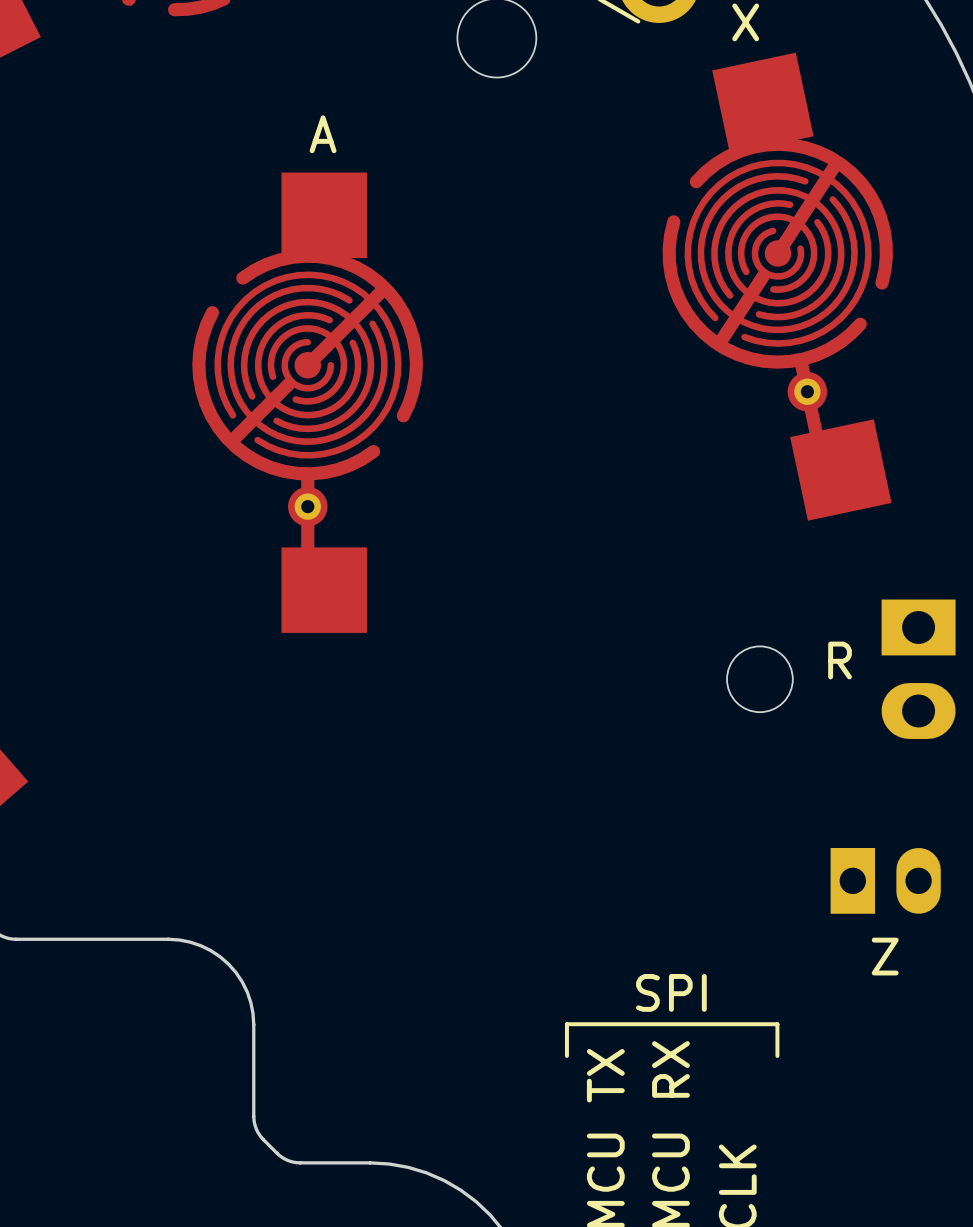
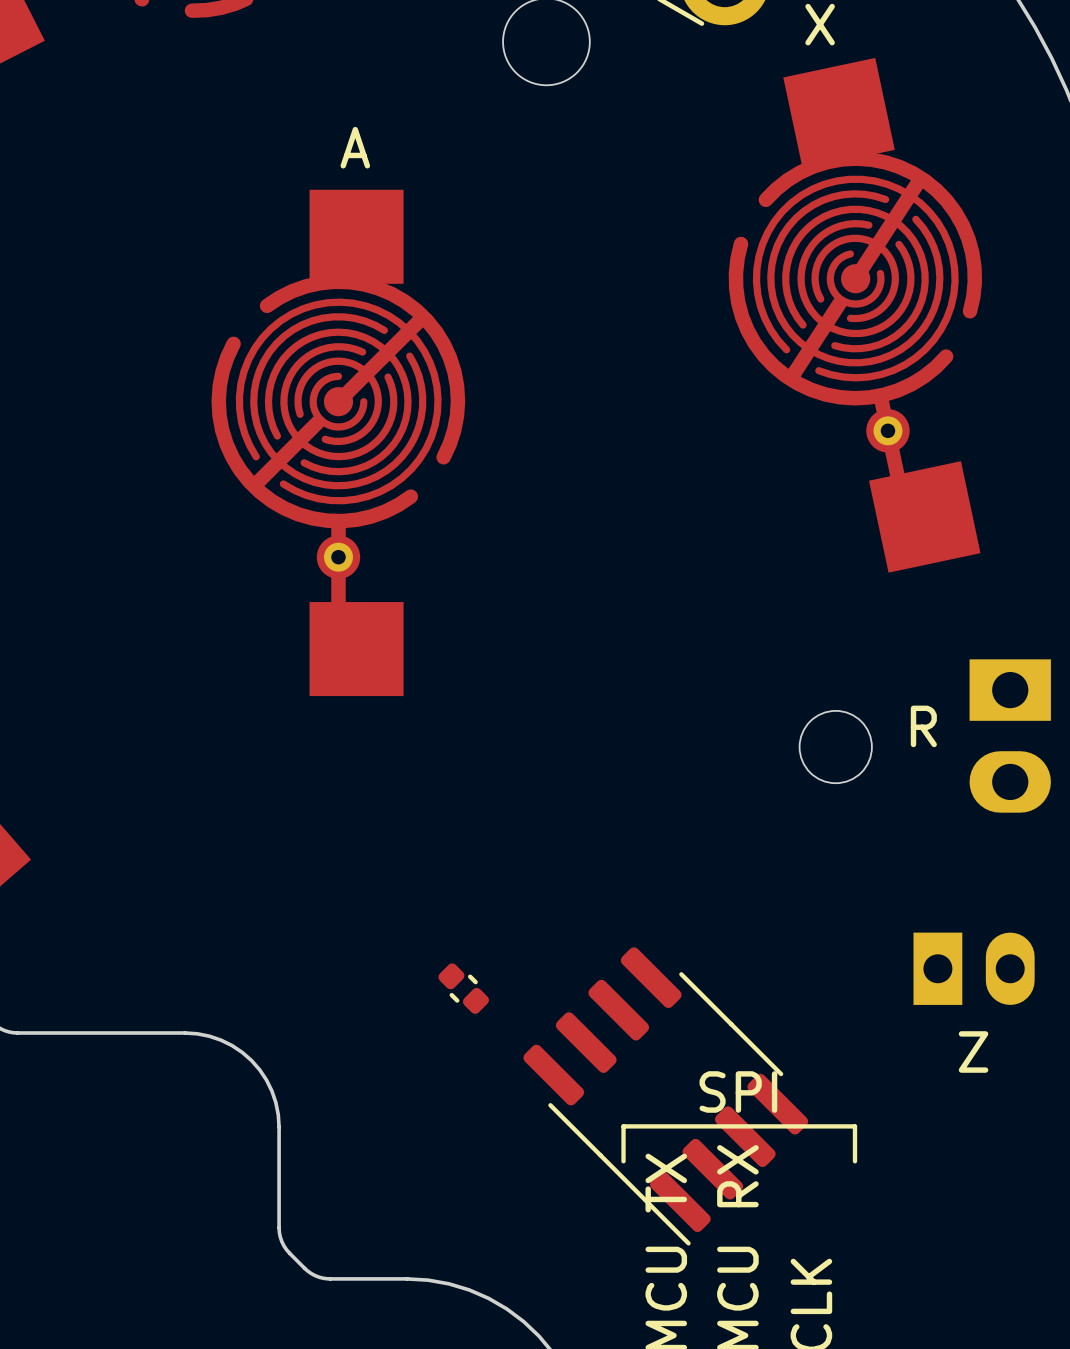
part: none -> (463, 988)
part: none -> (665, 1096)

